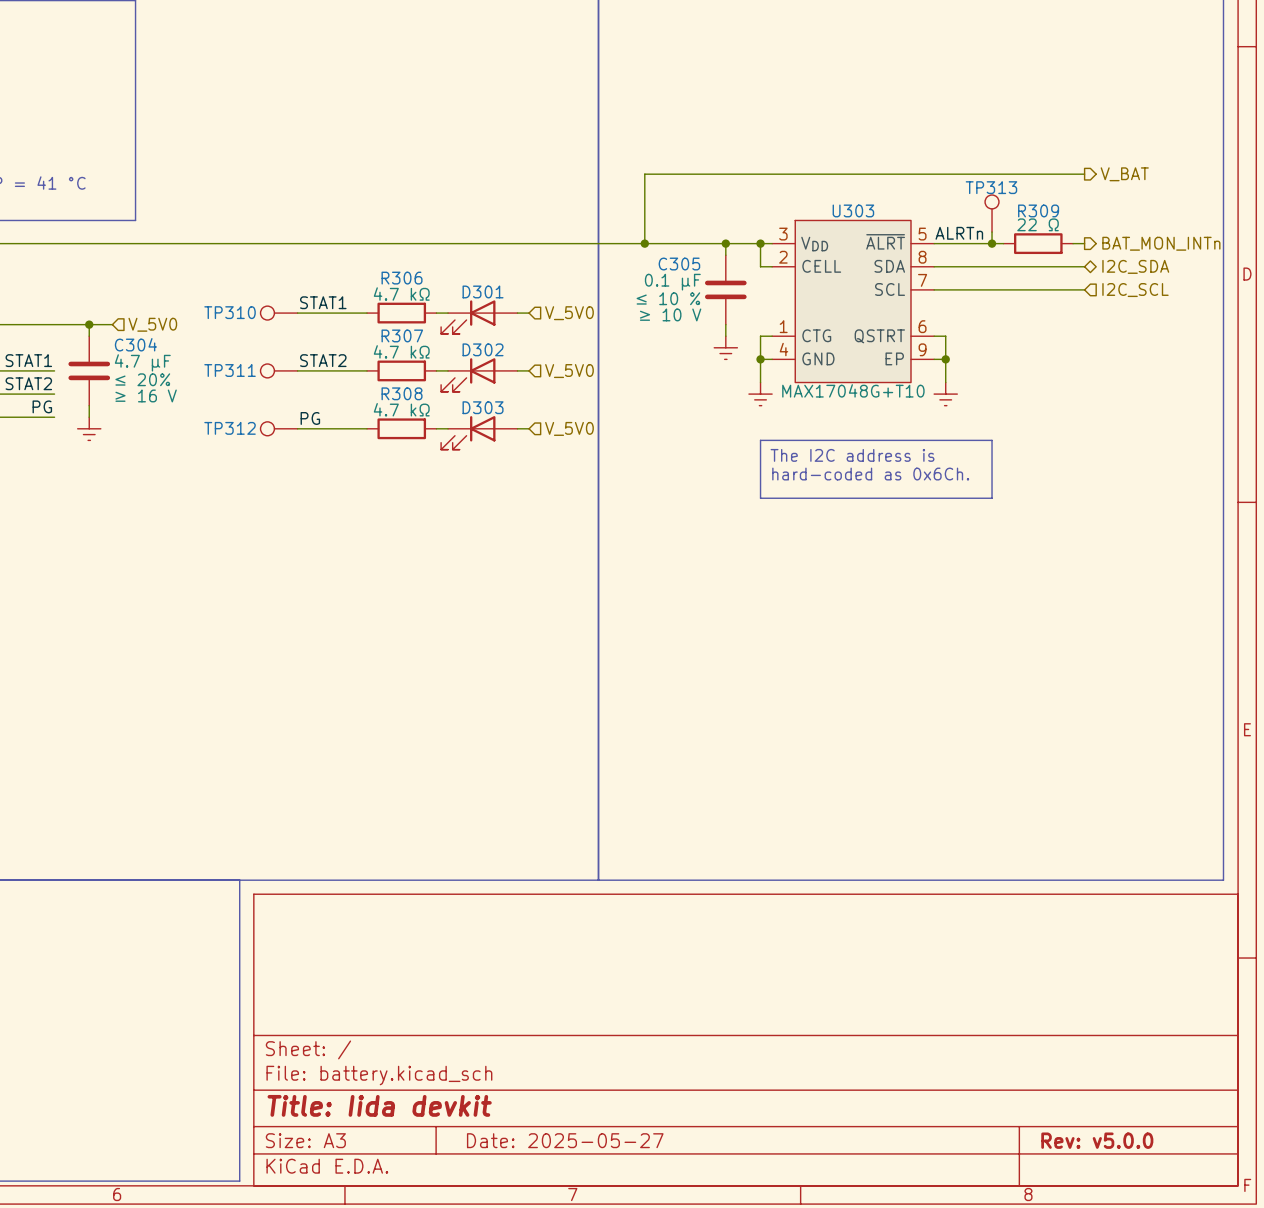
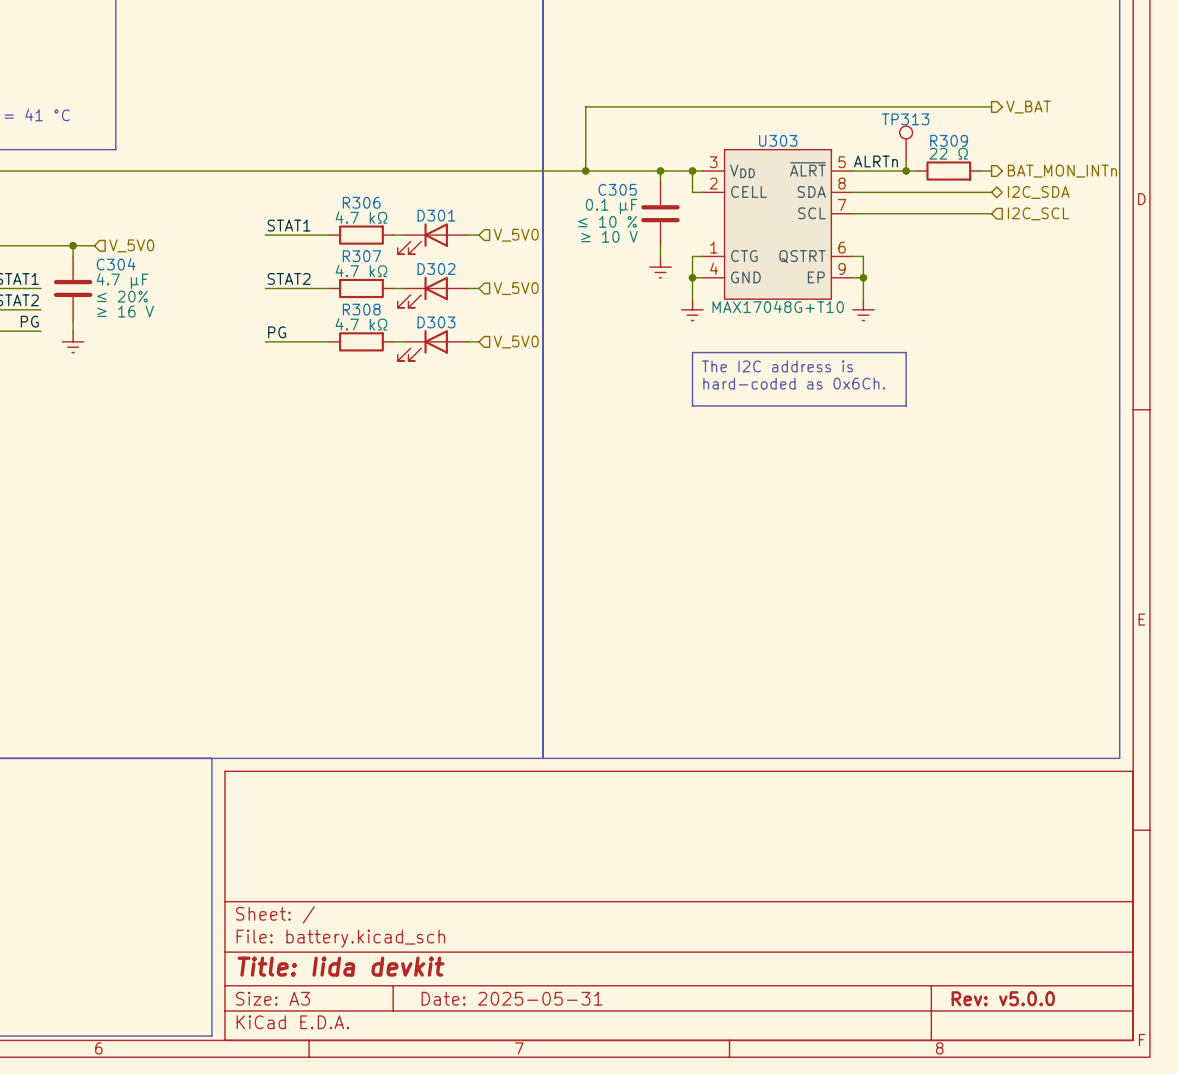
TP310: (279, 313) -> none
TP311: (279, 370) -> none
TP312: (279, 428) -> none
title block: Date: 2025-05-27 (565, 1140) -> Date: 2025-05-31 (512, 998)

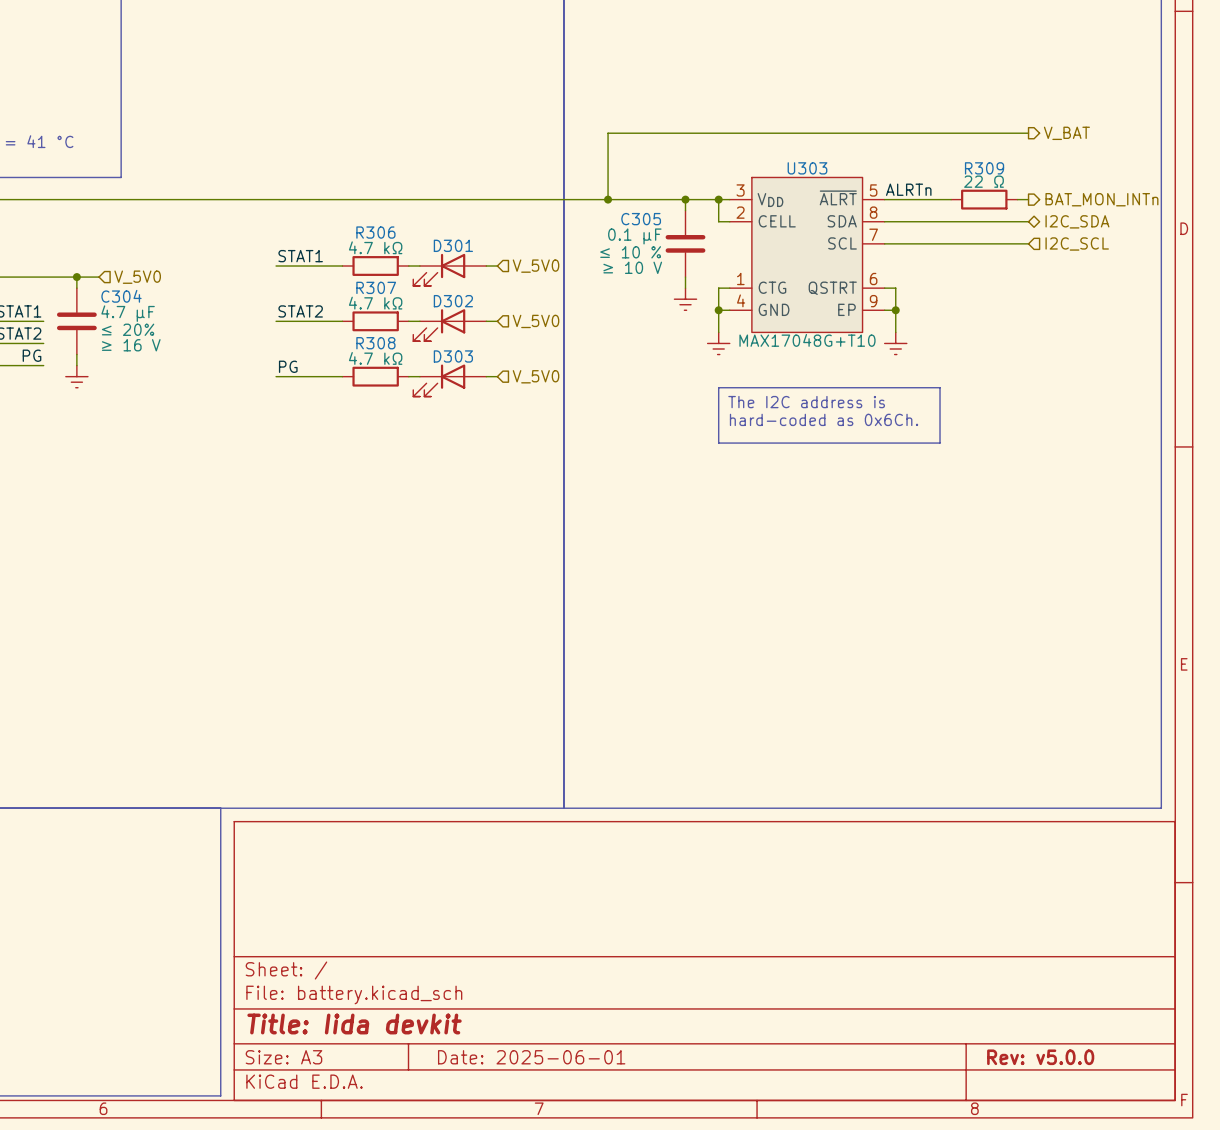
TP313: (906, 143) -> none
wire: (906, 160) (906, 171) -> none
junction: (906, 171) -> none
title block: Date: 2025-05-31 (512, 998) -> Date: 2025-06-01 (531, 1057)

